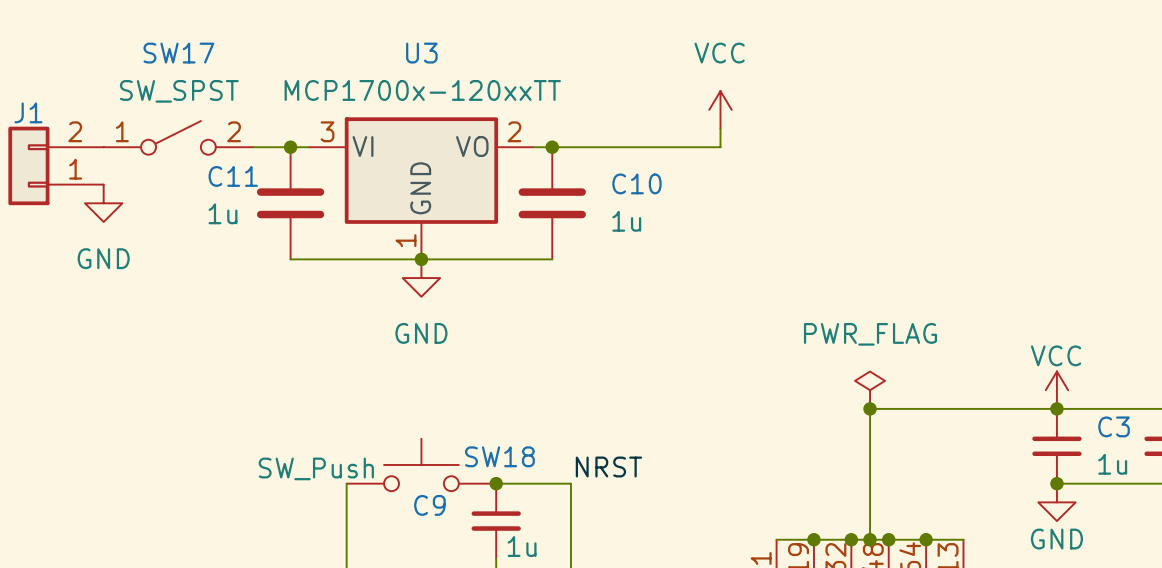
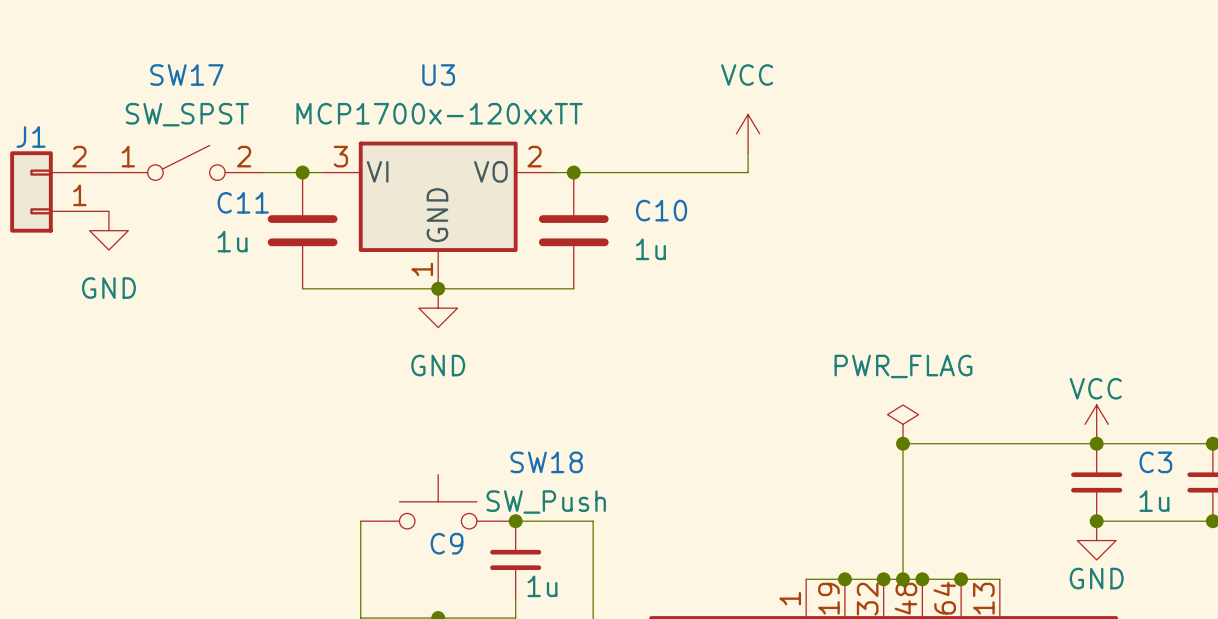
SW18 name position: SW18 (499, 456) -> SW18 (546, 462)
label: NRST (608, 467) -> none
SW18 value position: SW_Push (316, 468) -> SW_Push (546, 502)

